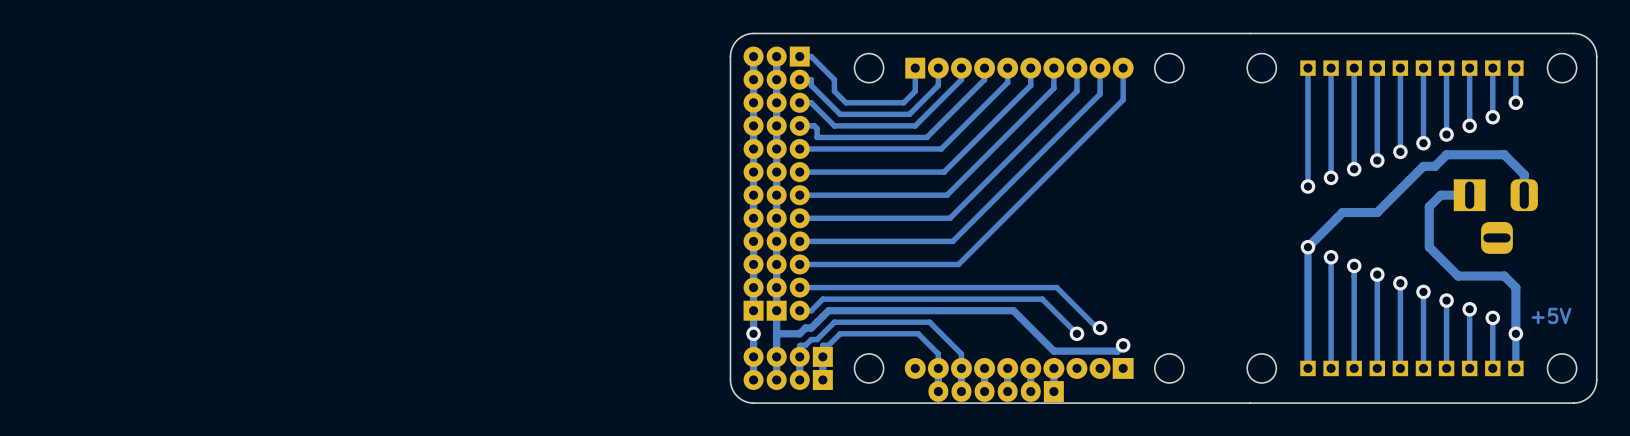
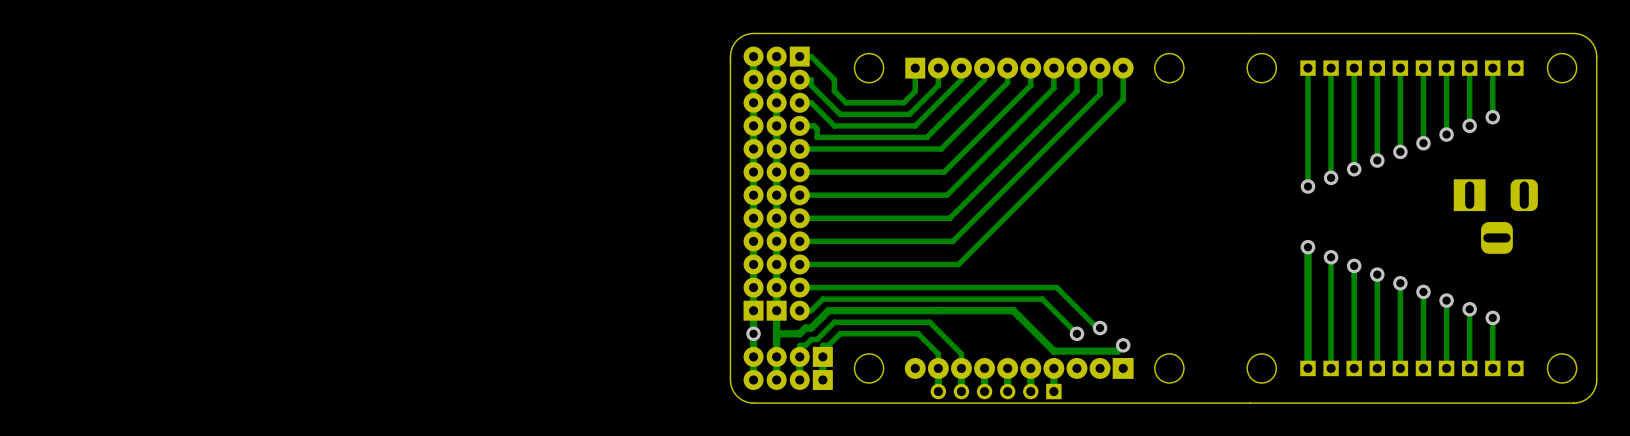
track: (1515, 68) (1515, 102) -> none
via: (1515, 102) -> none
track: (1469, 195) (1440, 195) (1429, 206) (1429, 247) (1458, 276) (1504, 276) (1515, 287) (1515, 368) -> none
track: (1524, 195) (1524, 174) (1504, 154) (1446, 154) (1435, 166) (1423, 166) (1377, 212) (1342, 212) (1307, 247) -> none
text: +5V (1551, 315) -> none
via: (1515, 333) -> none
part footprint: [928, 381, 1064, 403] -> [930, 383, 1062, 400]

